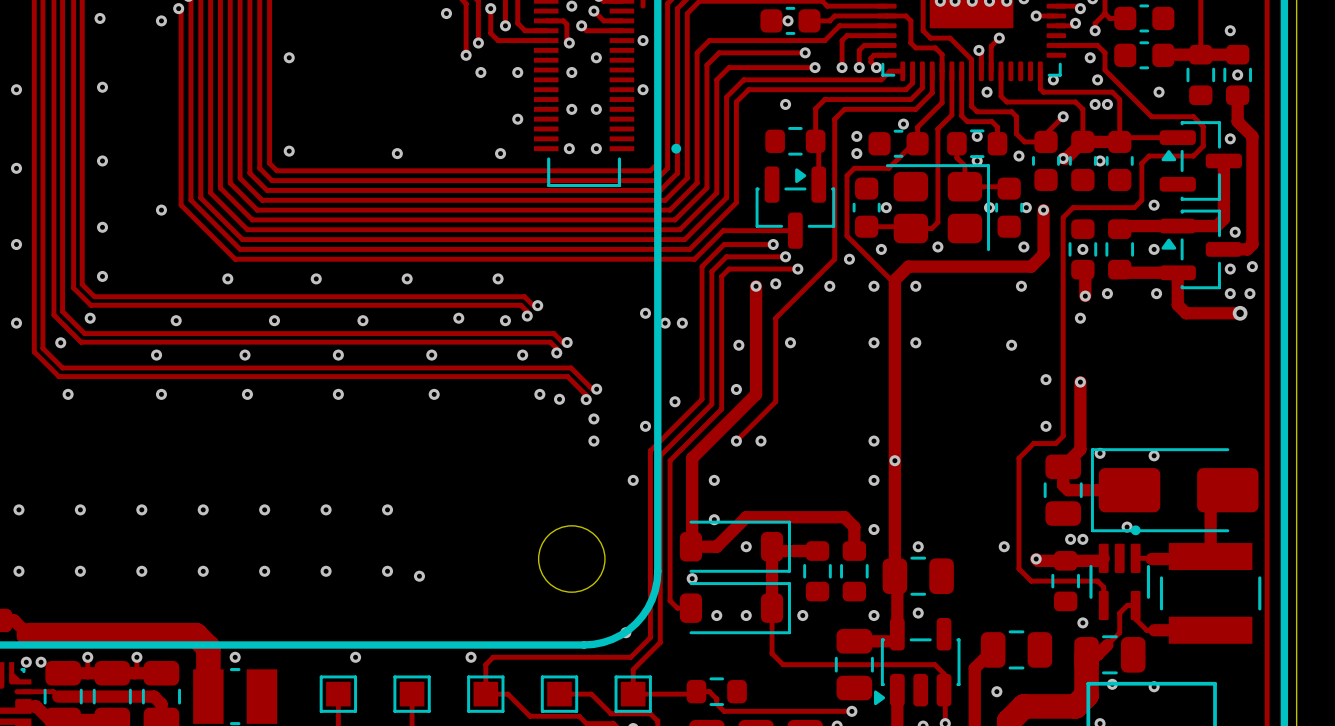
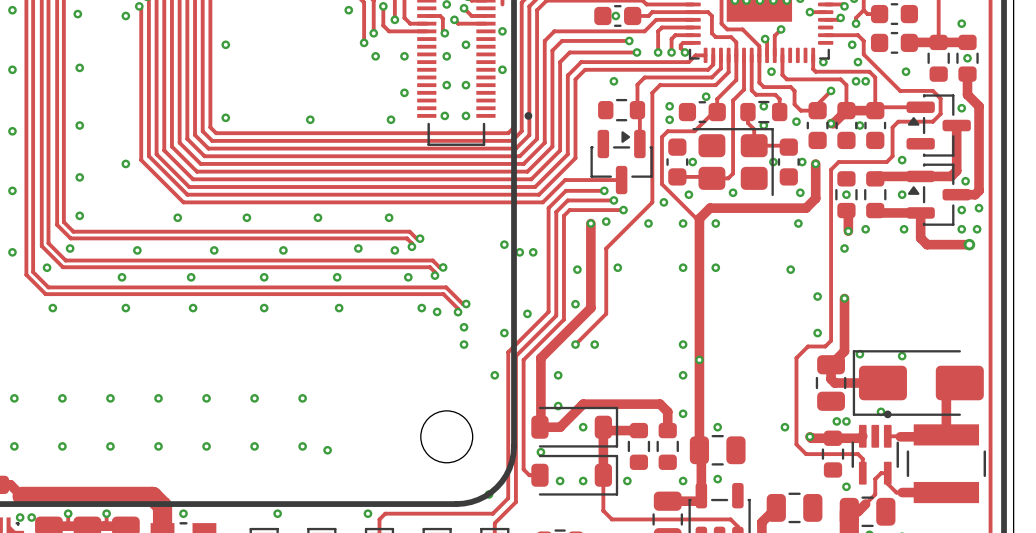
via: none -> (12, 10)

